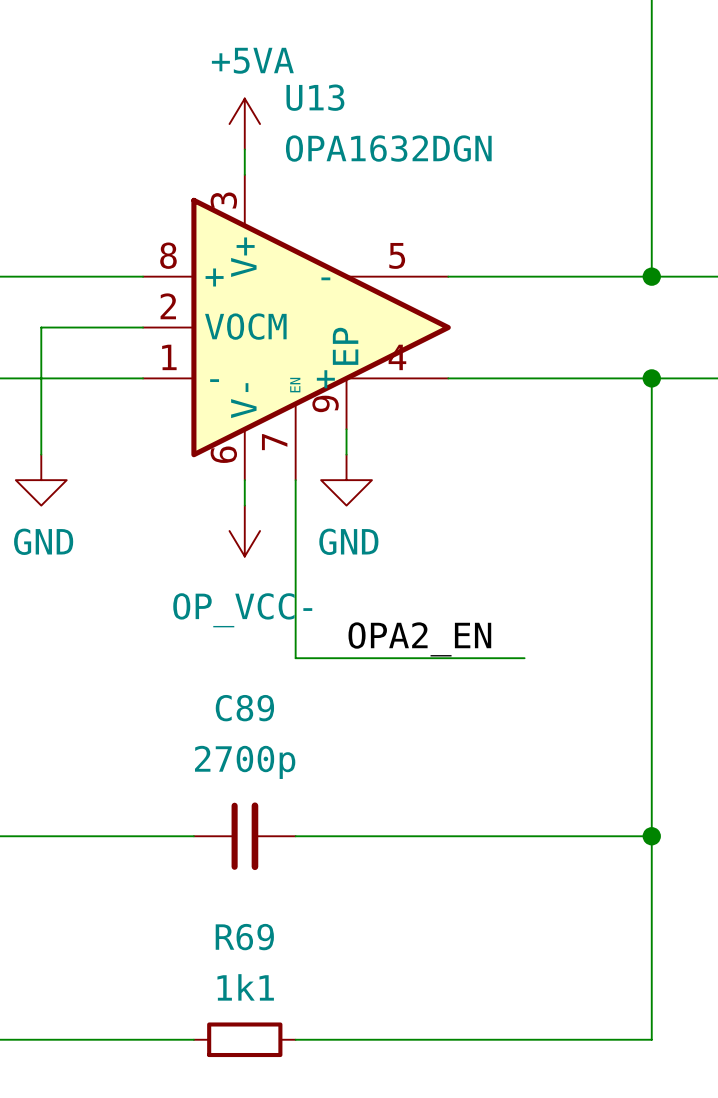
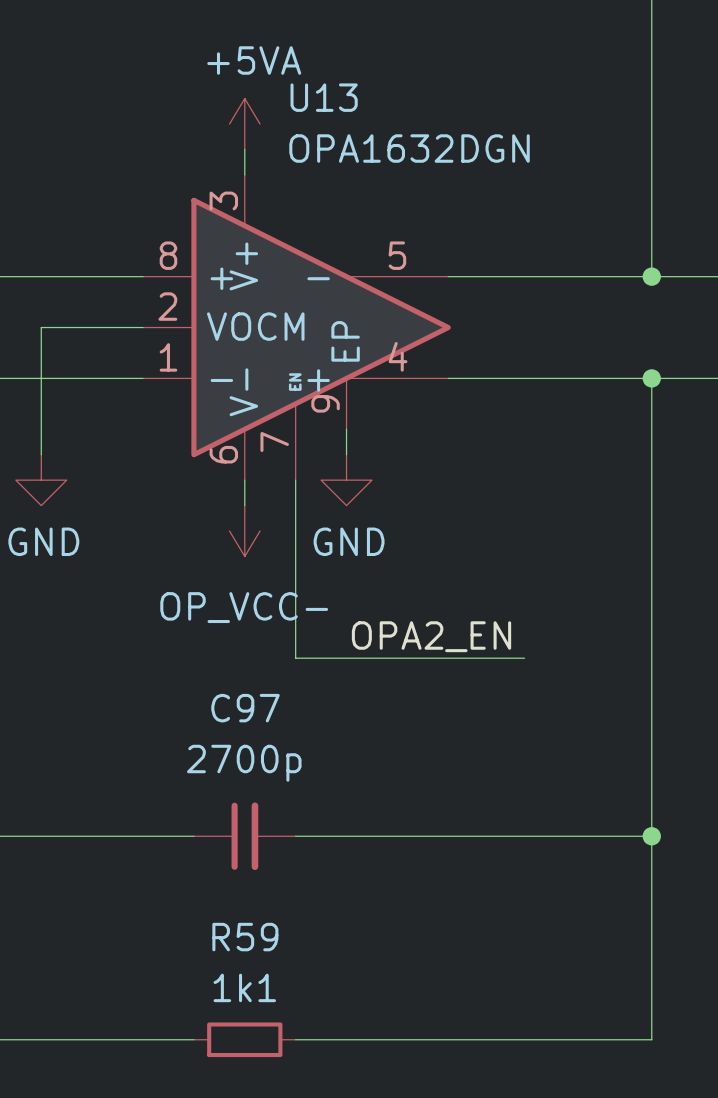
C89 name: C89 (244, 708) -> C97 (245, 708)
R69 name: R69 (244, 937) -> R59 (245, 937)

